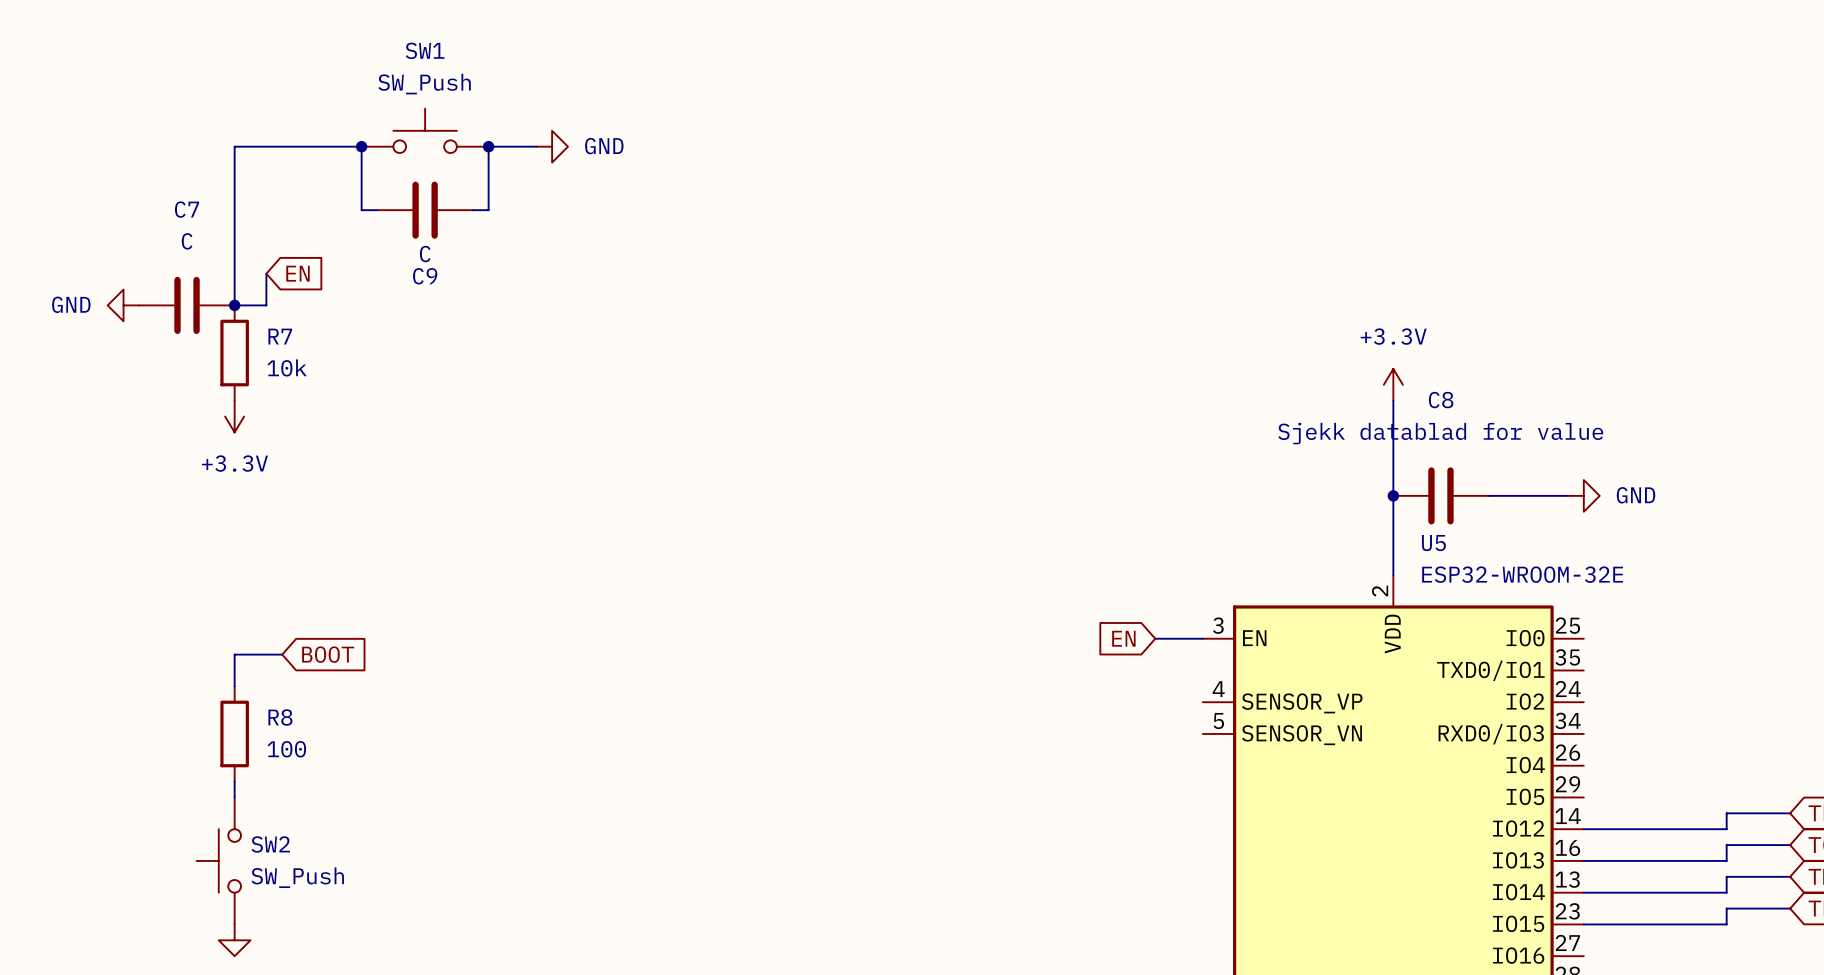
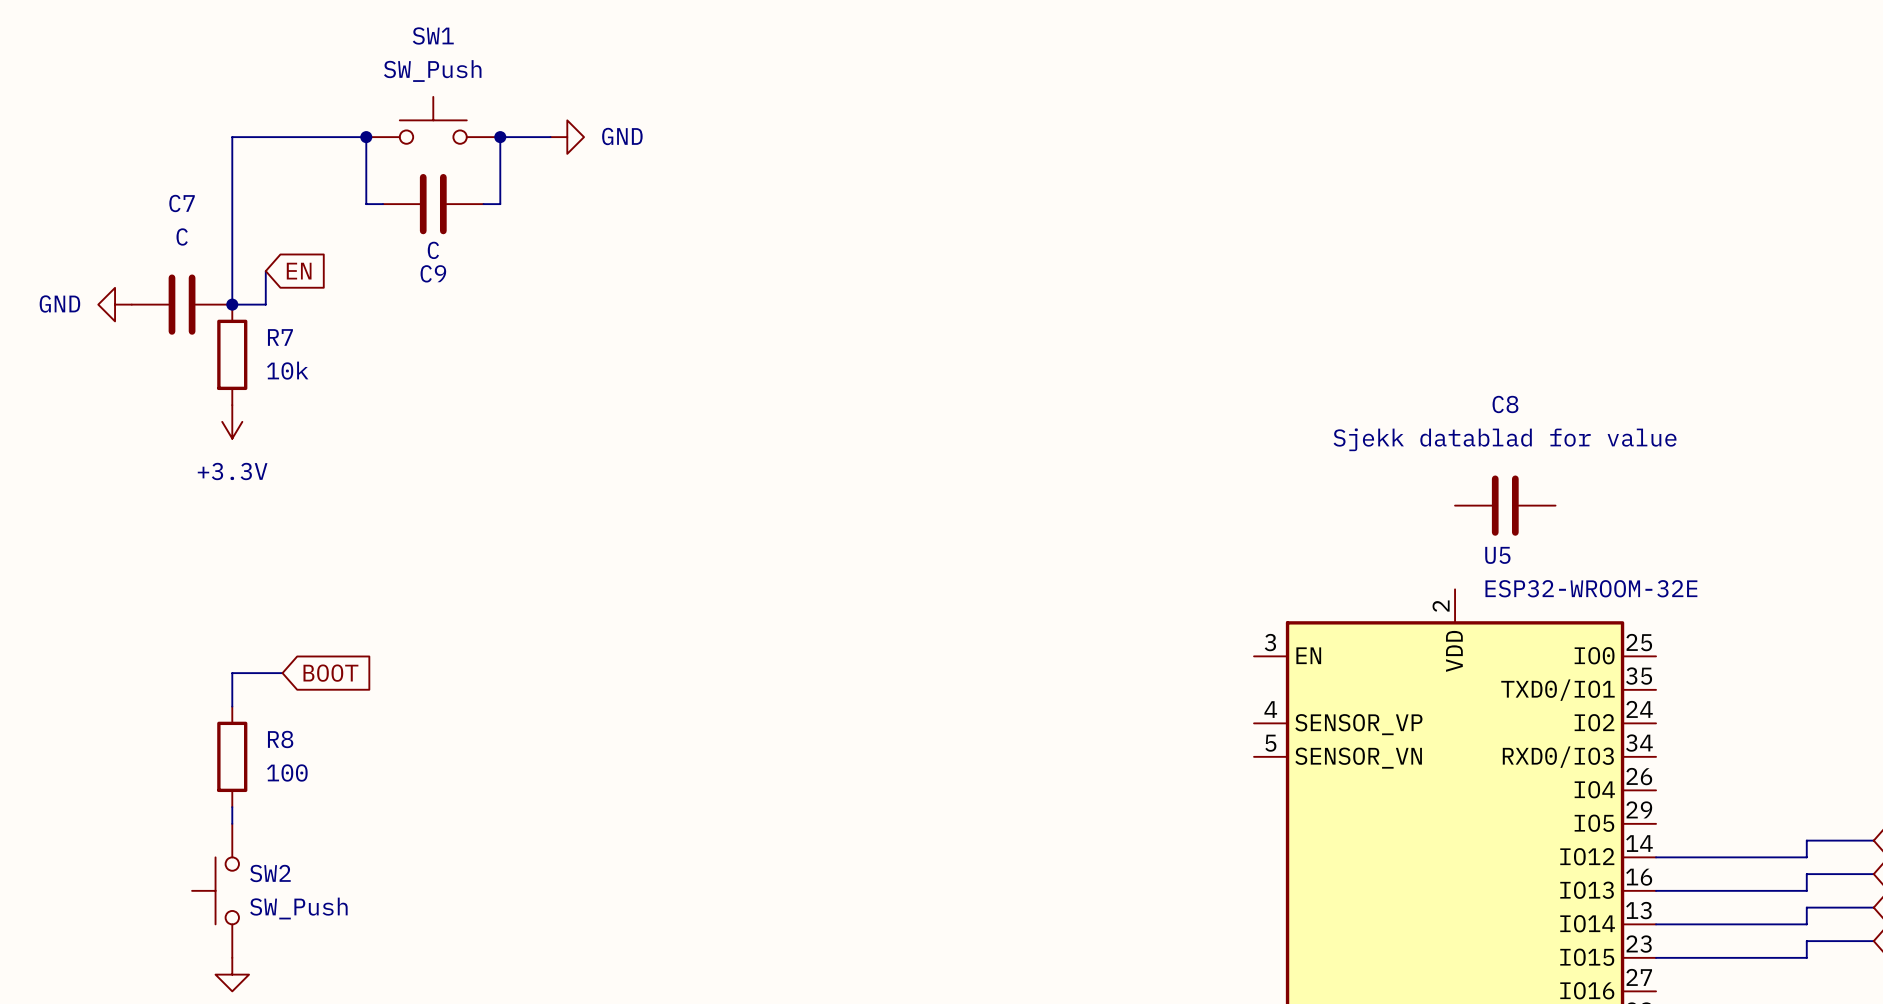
power symbol: +3.3V (1393, 384) -> none
wire: (1393, 400) (1393, 575) -> none
junction: (1393, 495) -> none
wire: (1488, 495) (1567, 495) -> none
power symbol: GND (1583, 495) -> none
global label: EN (1123, 638) -> none
wire: (1155, 638) (1202, 638) -> none

